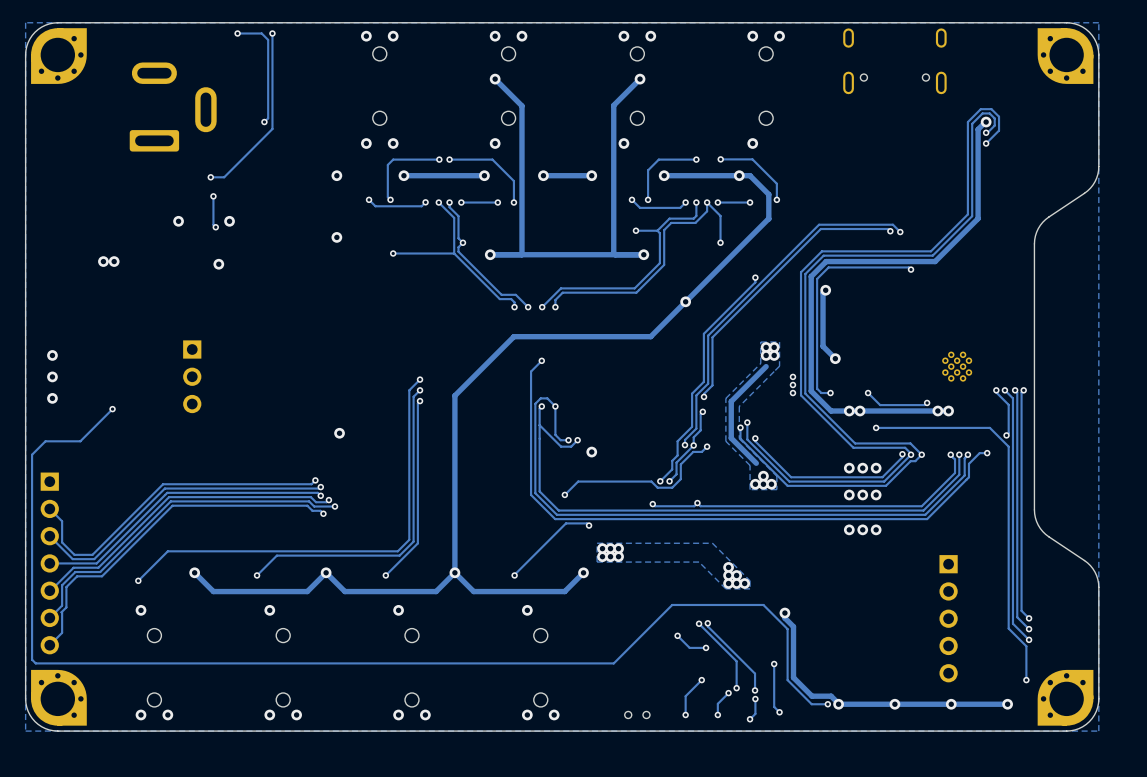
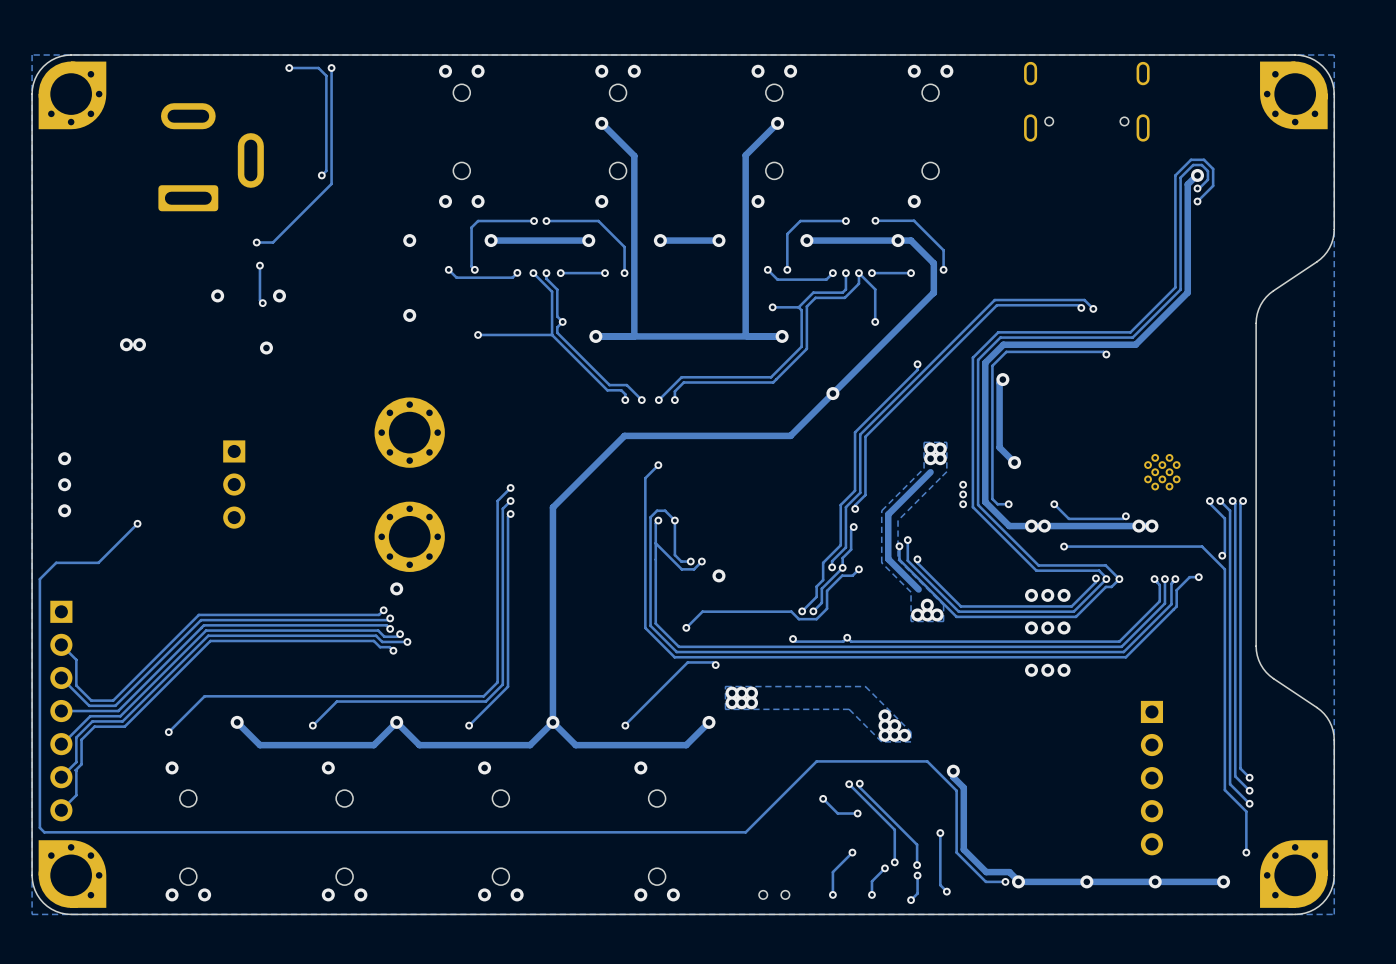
part: none -> (409, 432)
part: none -> (409, 536)
via position: (339, 433) -> (396, 588)

